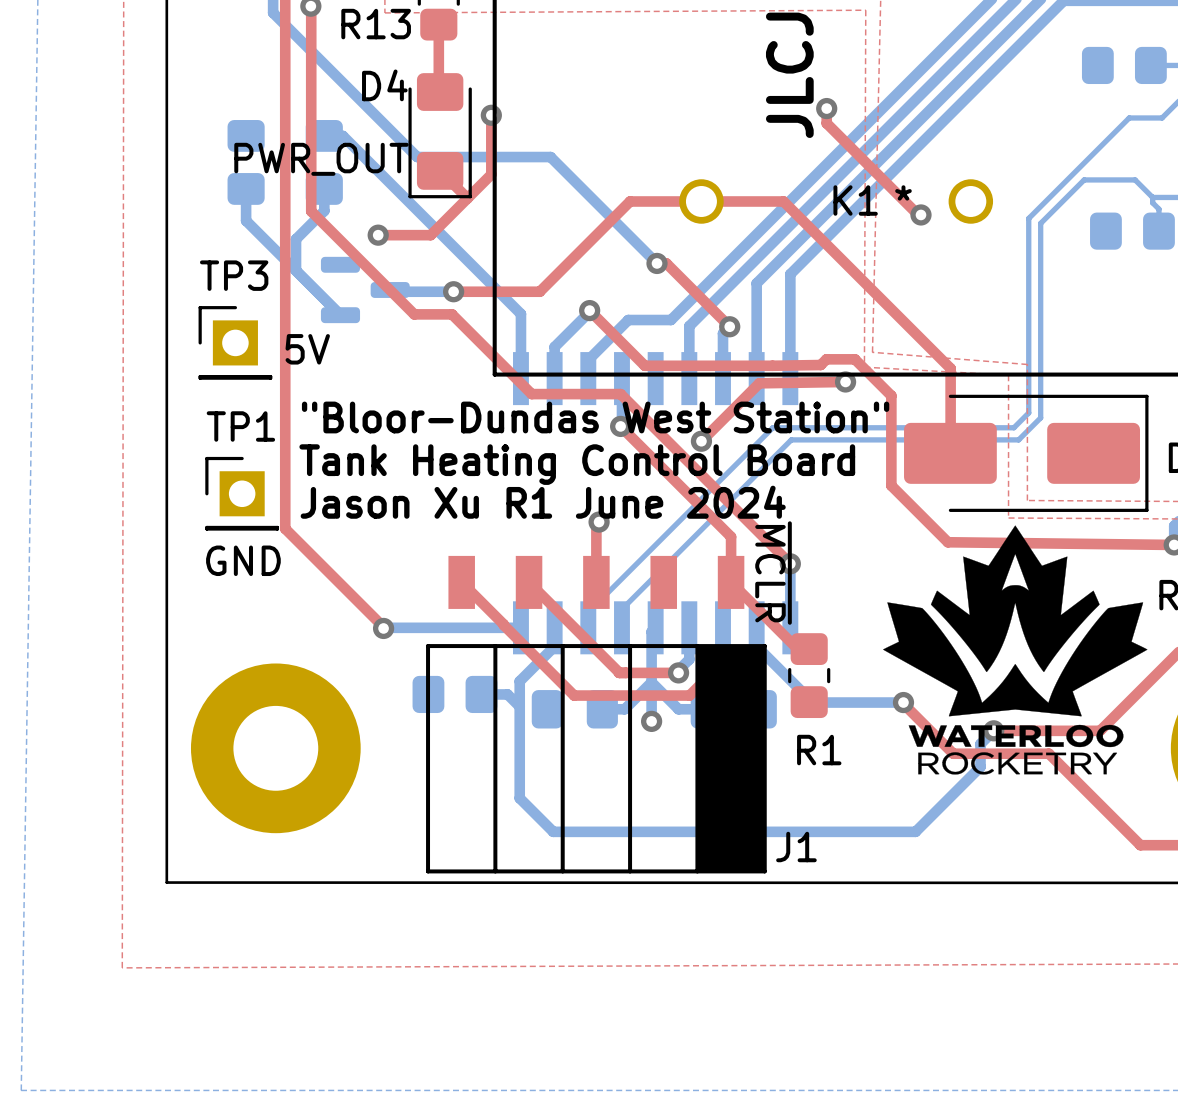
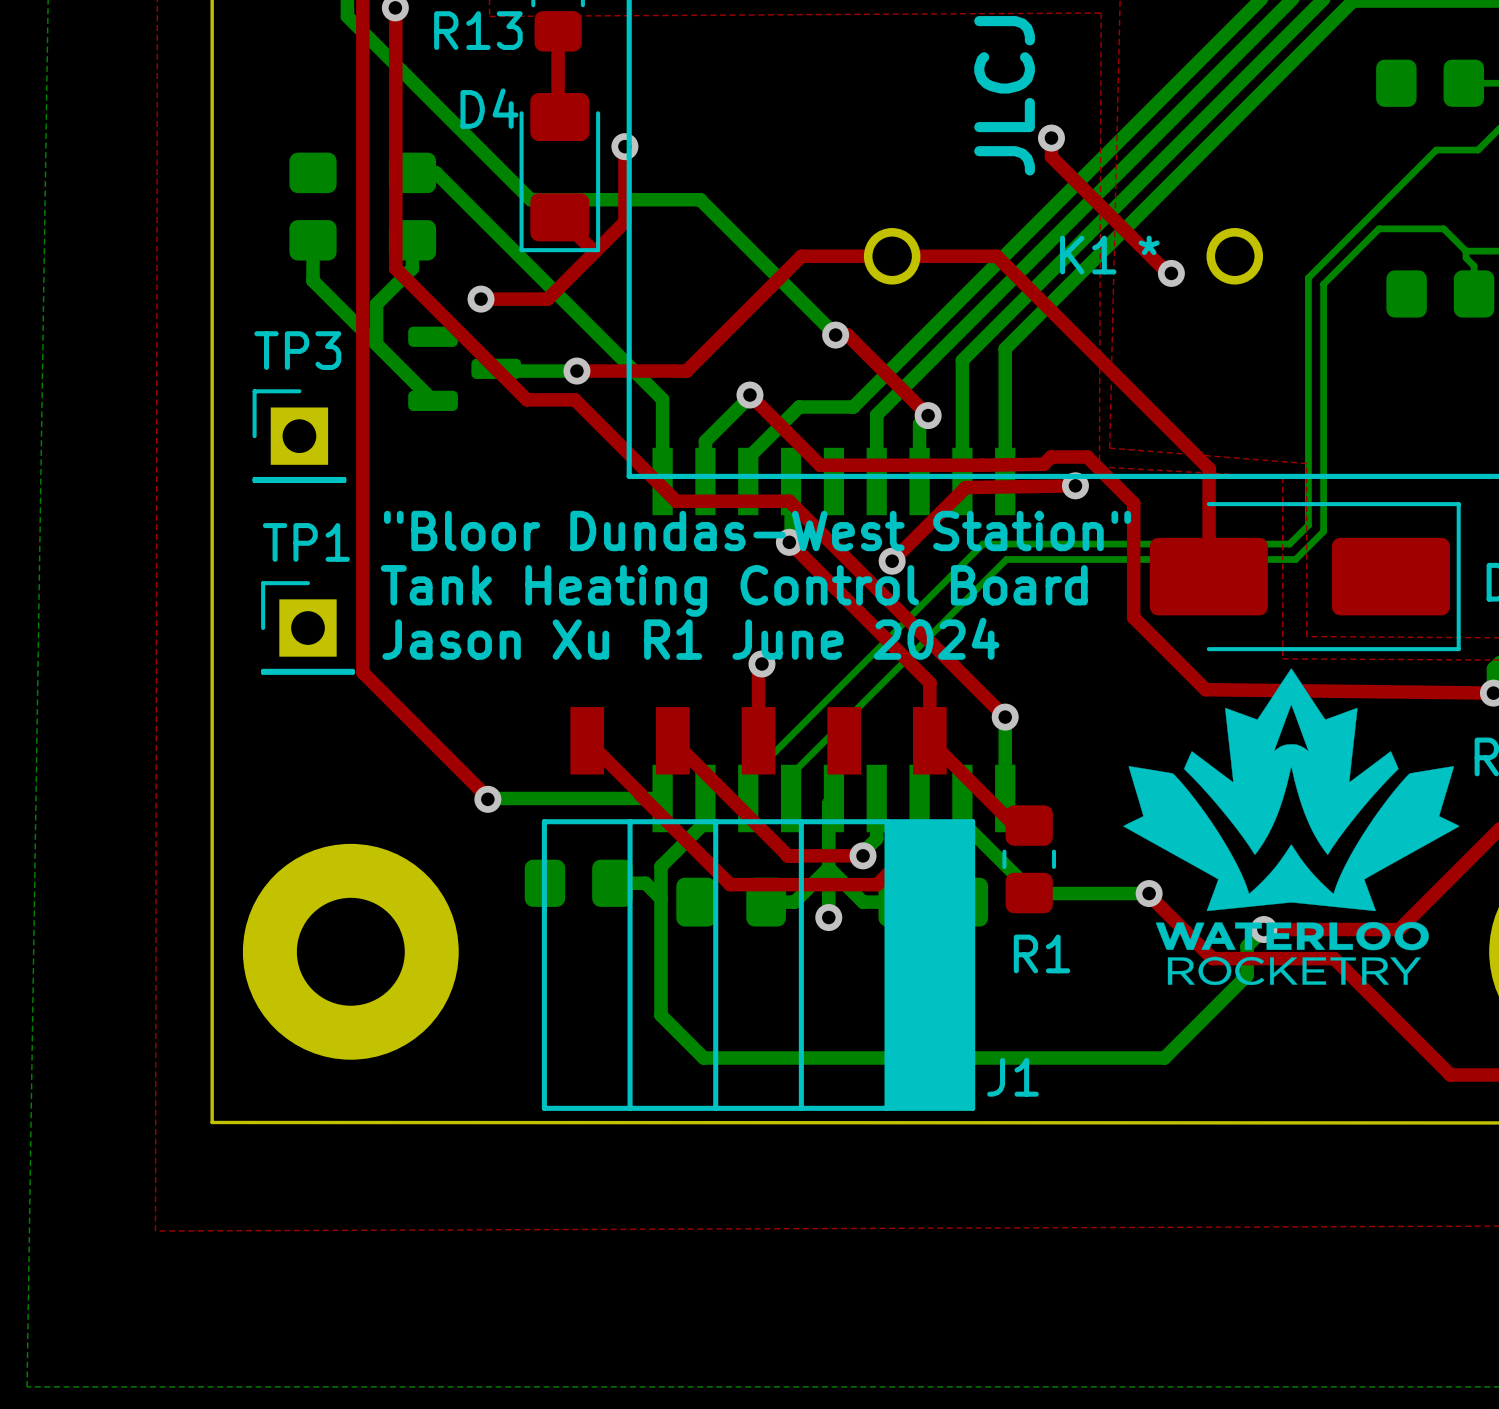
text: PWR_OUT (321, 159) -> none
text: 5V (307, 349) -> none
text: "Bloor-Dundas West Station" (595, 417) -> "Bloor Dundas-West Station" (757, 530)
text: GND (243, 560) -> none
text: ~{MCLR} (773, 573) -> none

